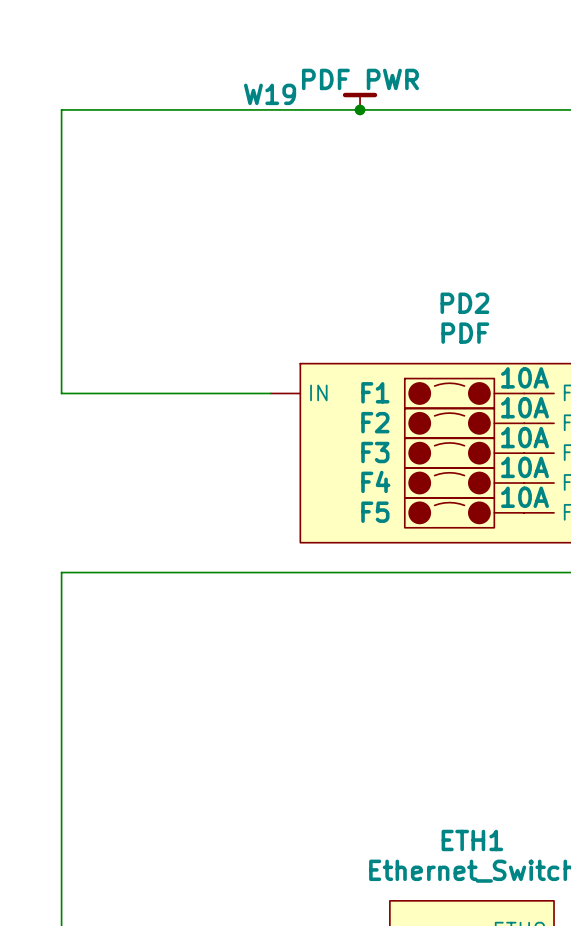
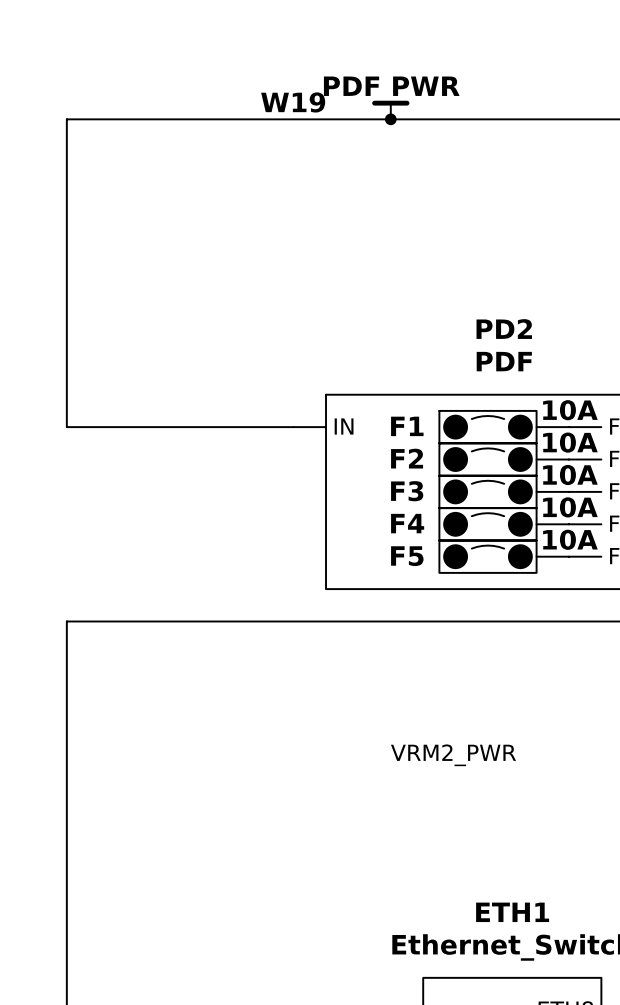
label: none -> VRM2_PWR (453, 755)

